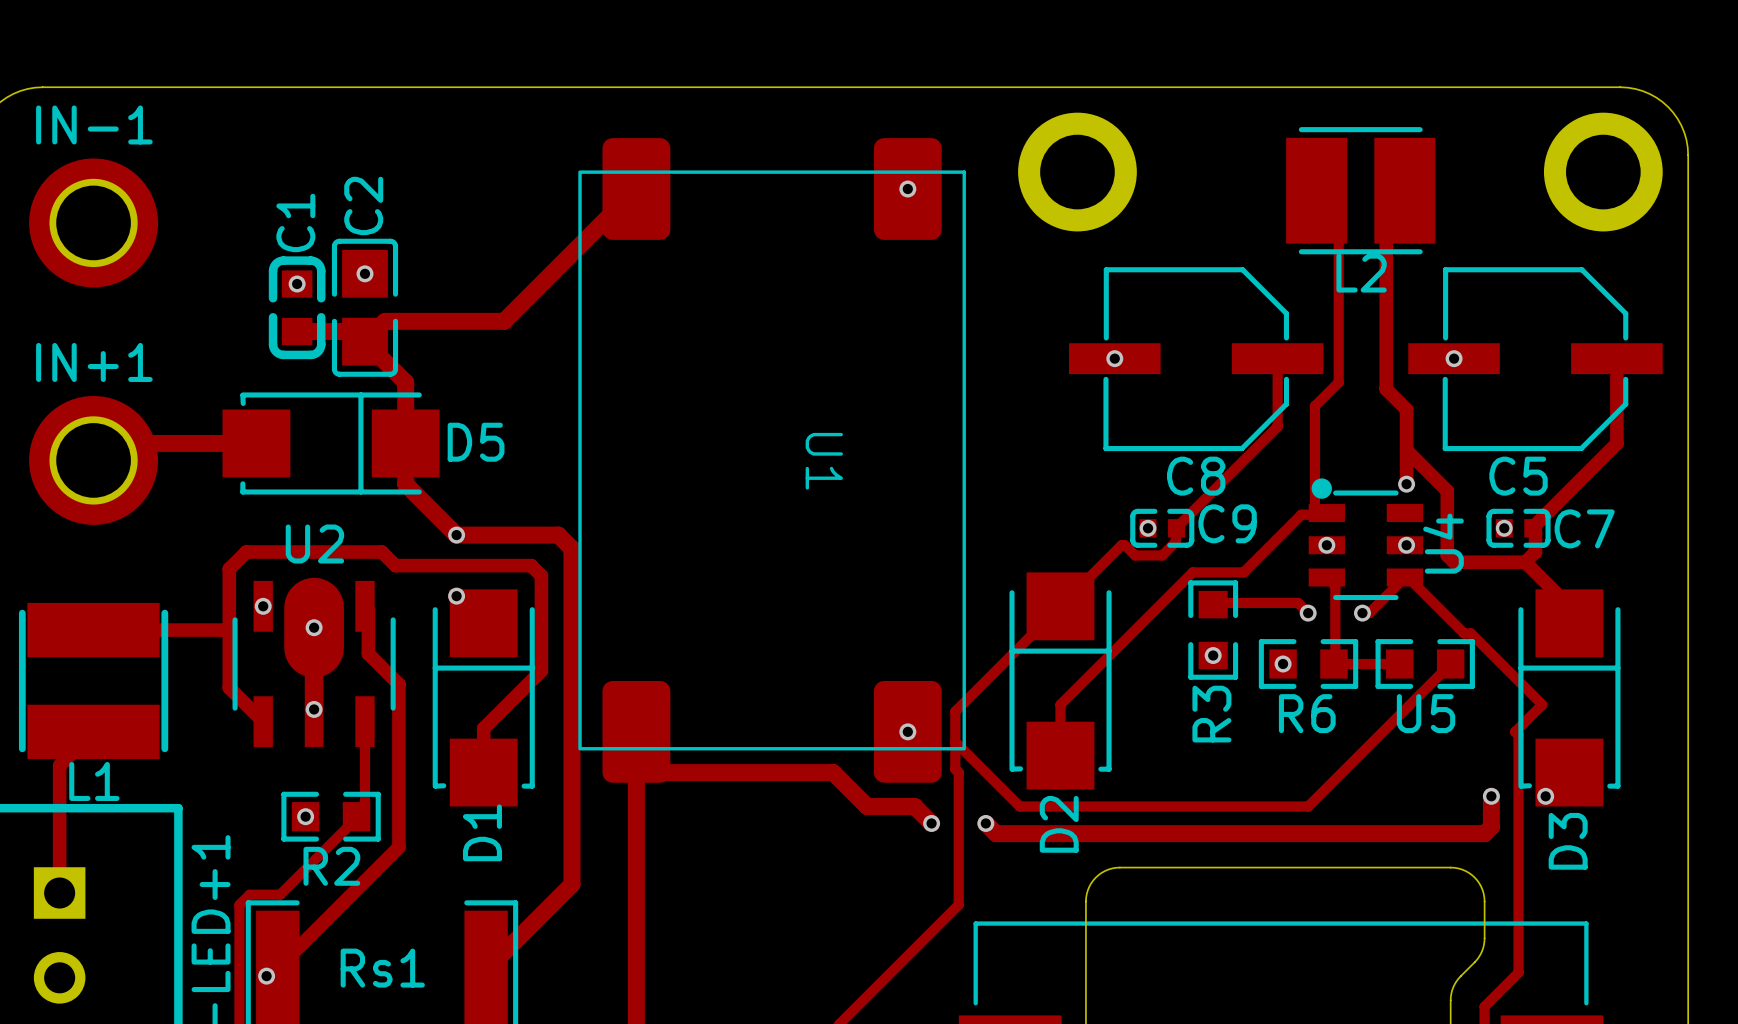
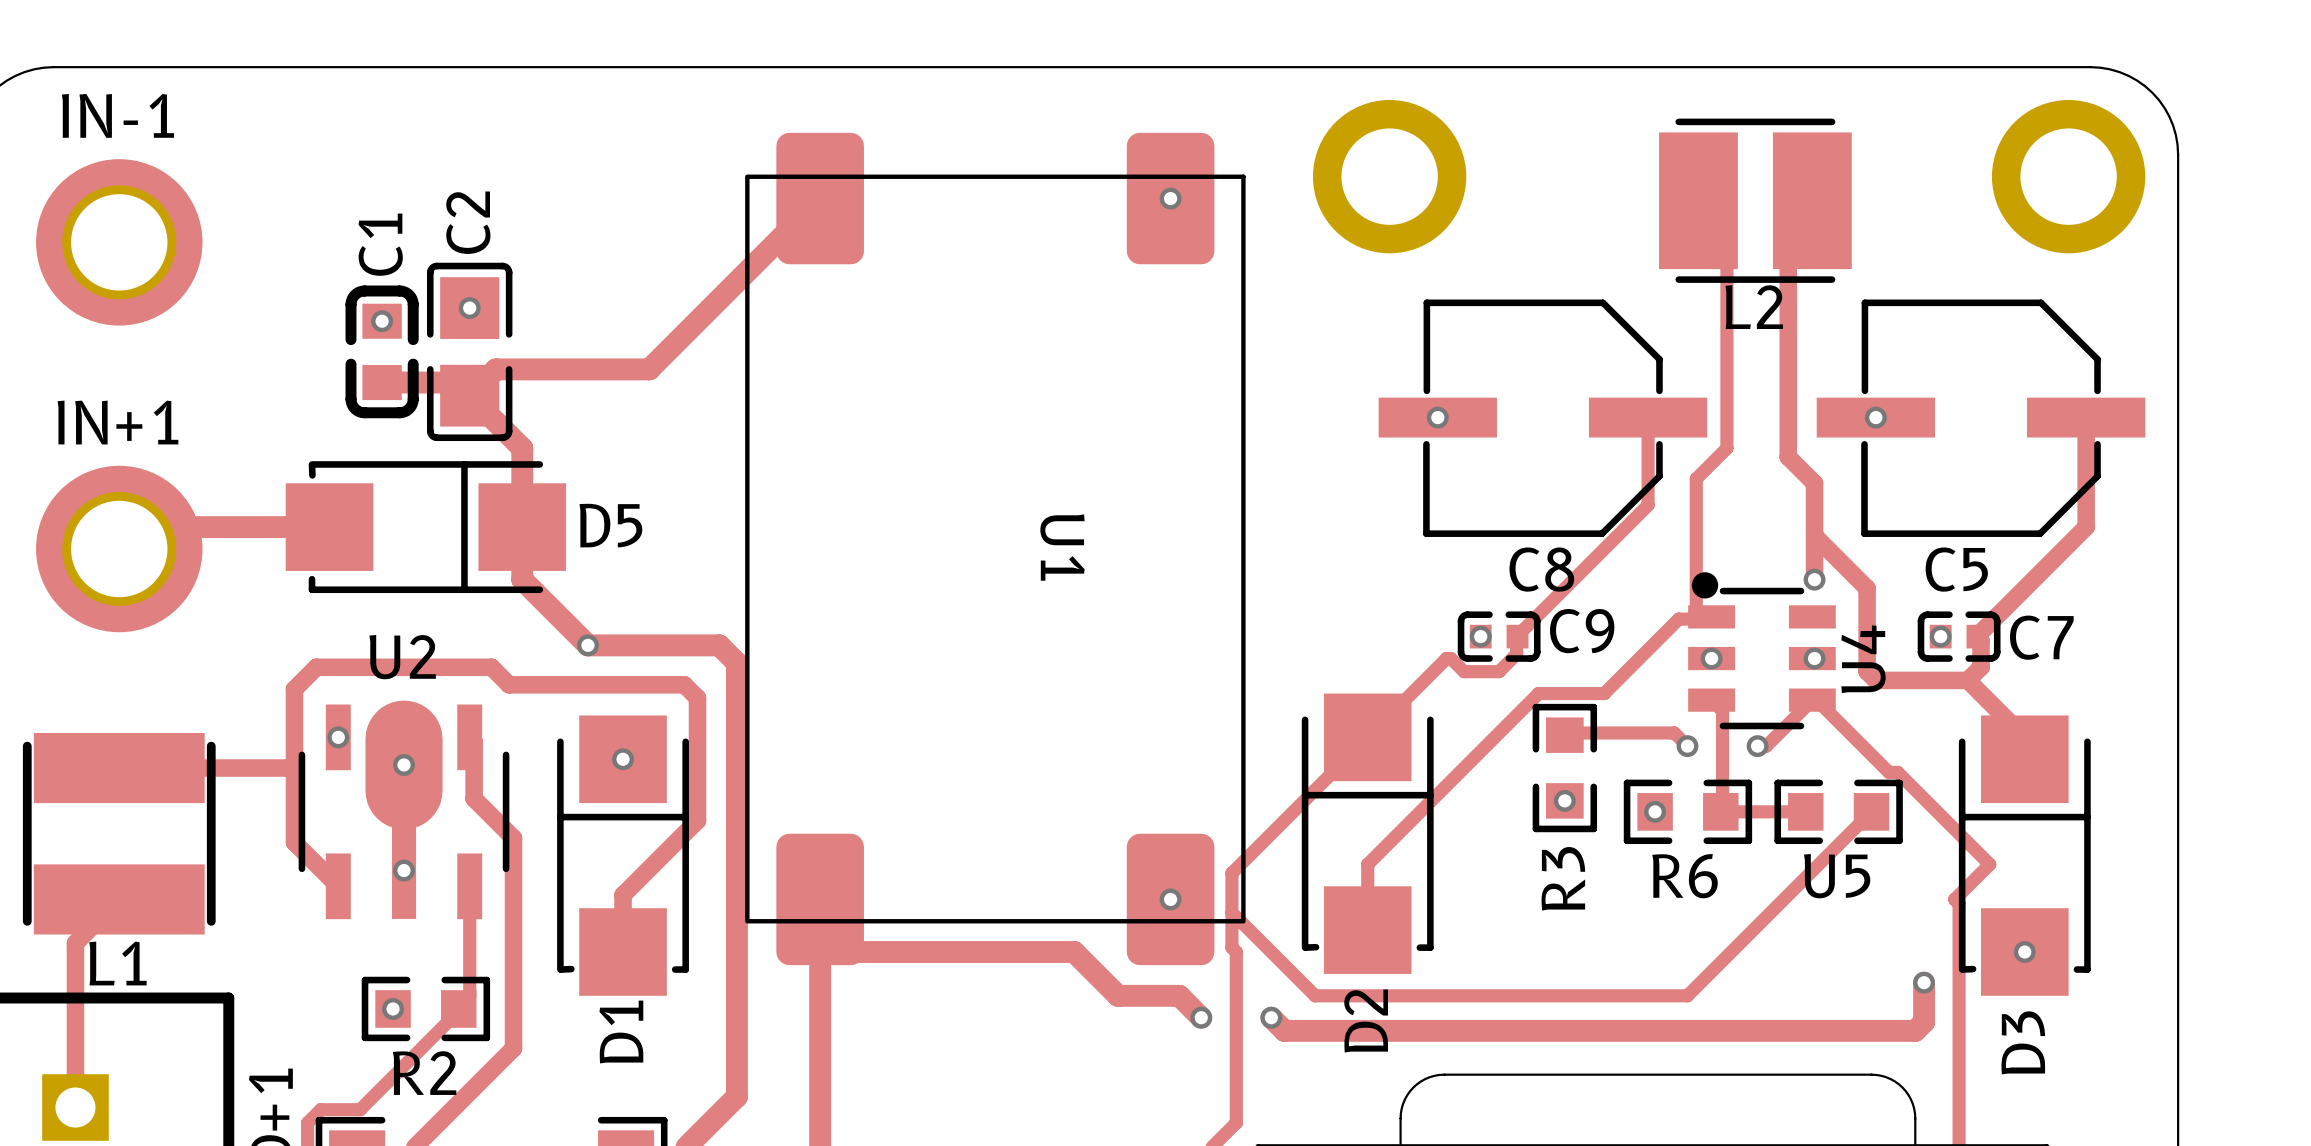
via position: (456, 596) -> (623, 759)
via position: (1545, 796) -> (2024, 952)

